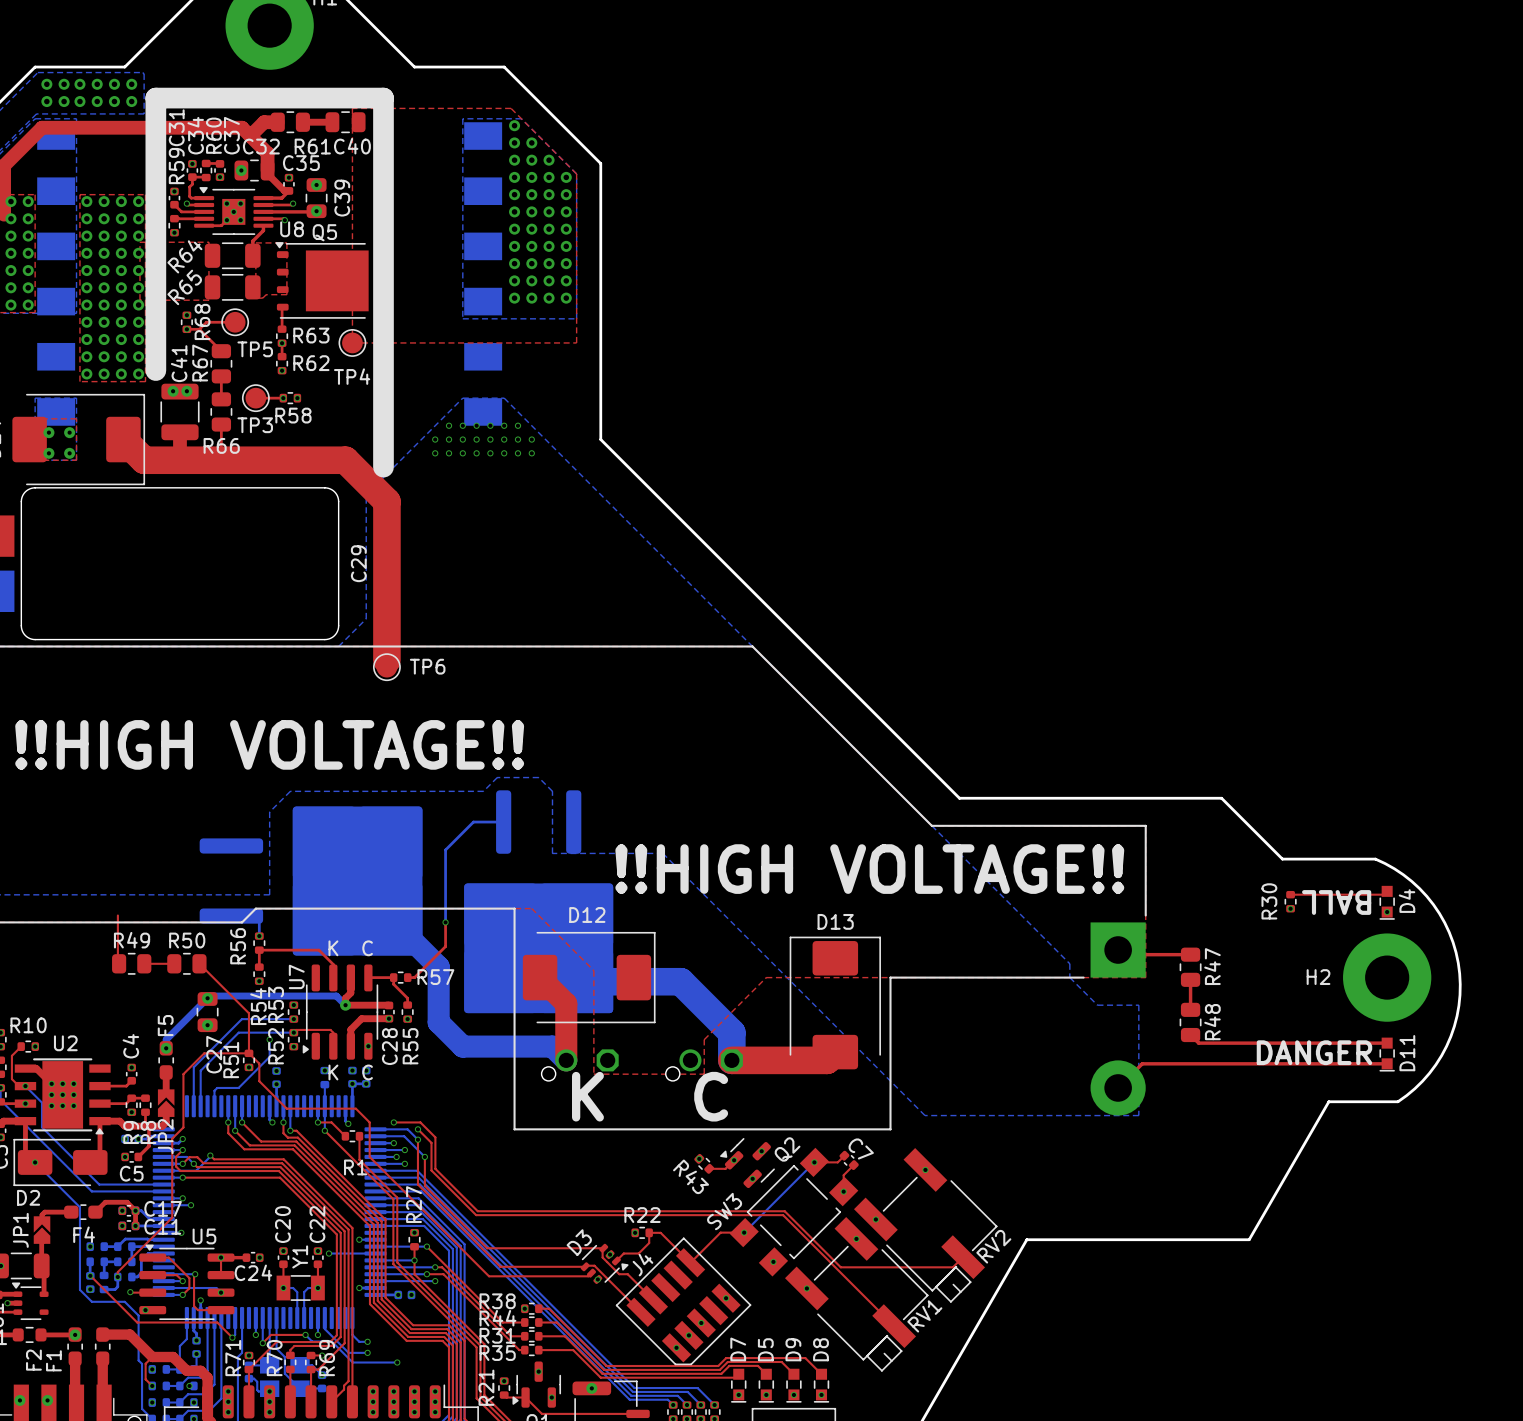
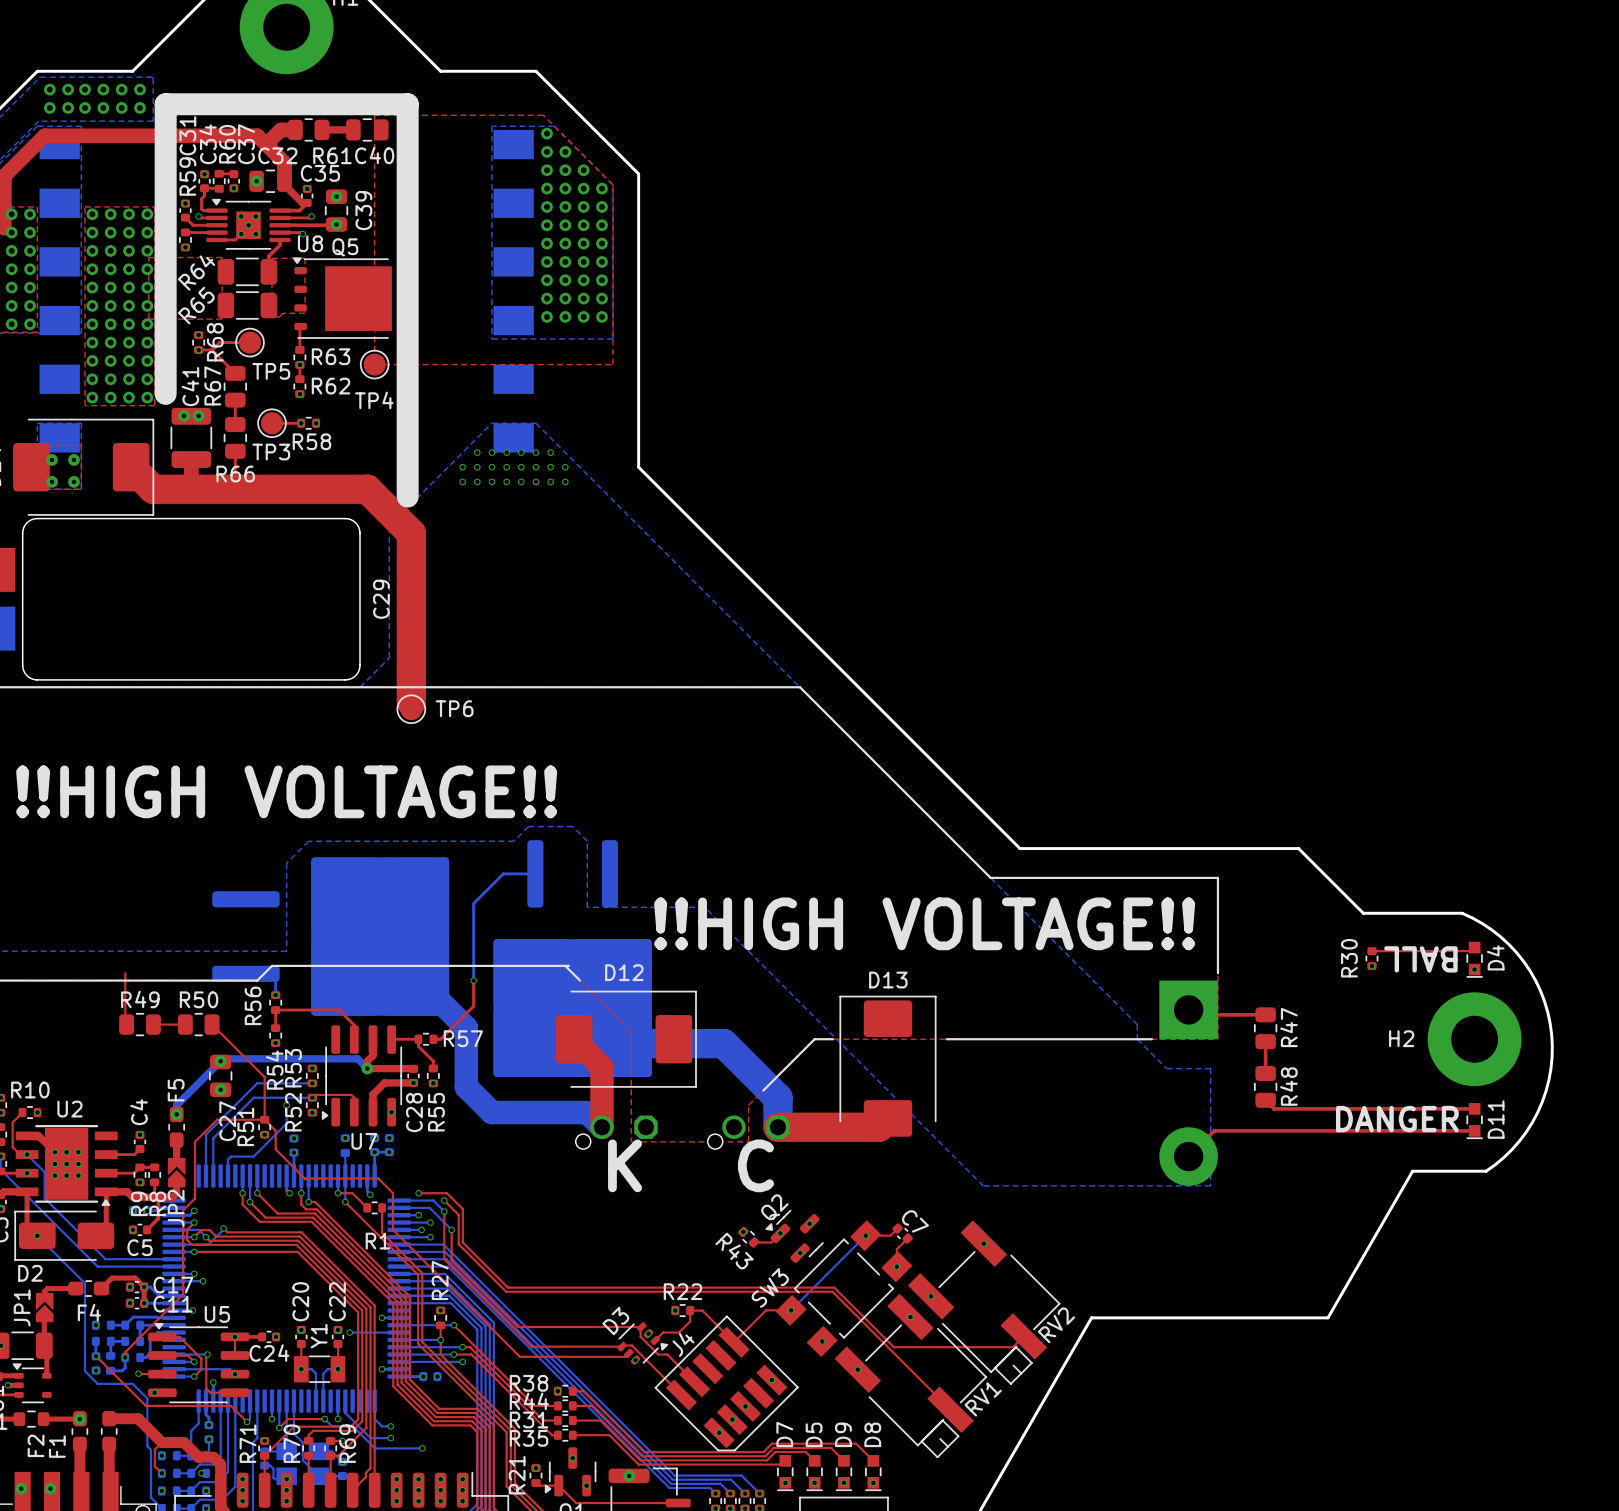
line: (514, 908) (514, 1129) (890, 1129) (890, 977) -> (546, 965) (568, 965)
line: none -> (565, 965) (579, 980)
text: K (333, 948) -> none
text: C (367, 948) -> none
U7 name rotation: 0° (296, 976) -> 90° clockwise (364, 1141)
U7 name position: U7 (296, 976) -> U7 (364, 1141)
line: none -> (832, 1039) (814, 1039) (763, 1090)
text: K (333, 1072) -> none
text: C (367, 1072) -> none
Q2 name position: Q2 (787, 1149) -> Q2 (774, 1207)

